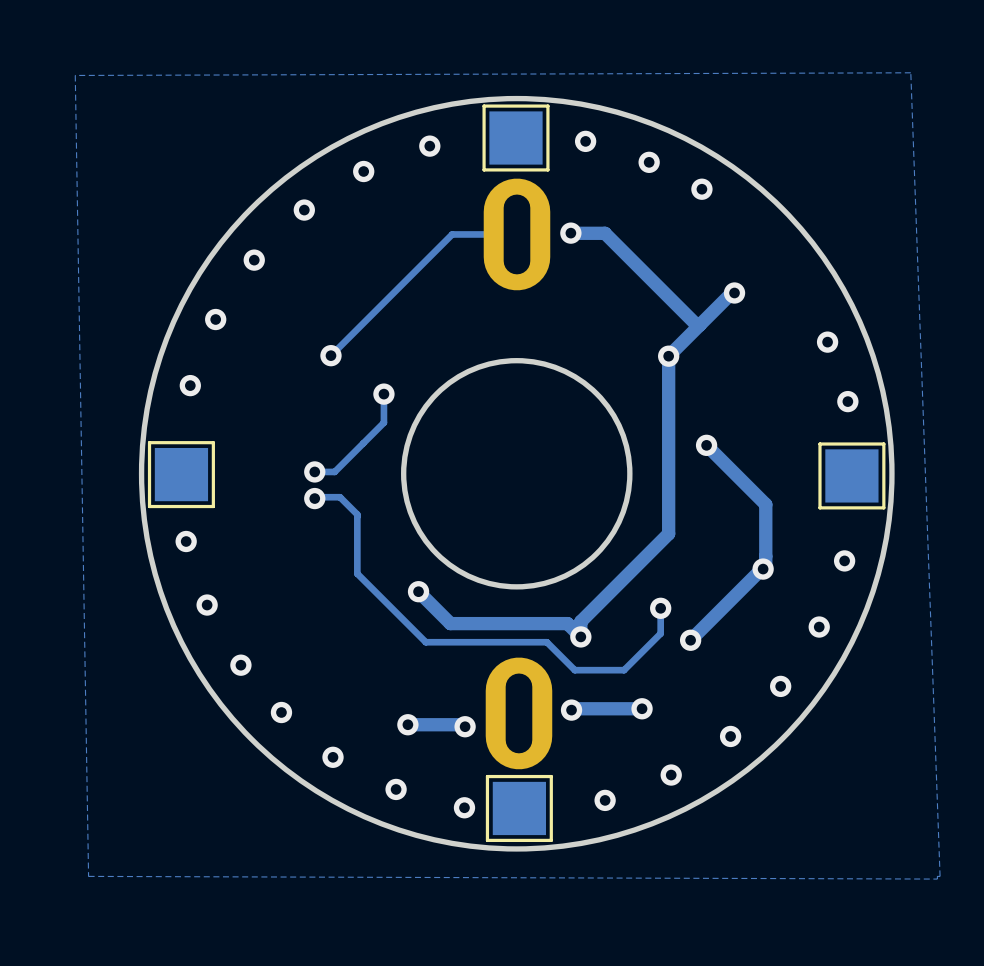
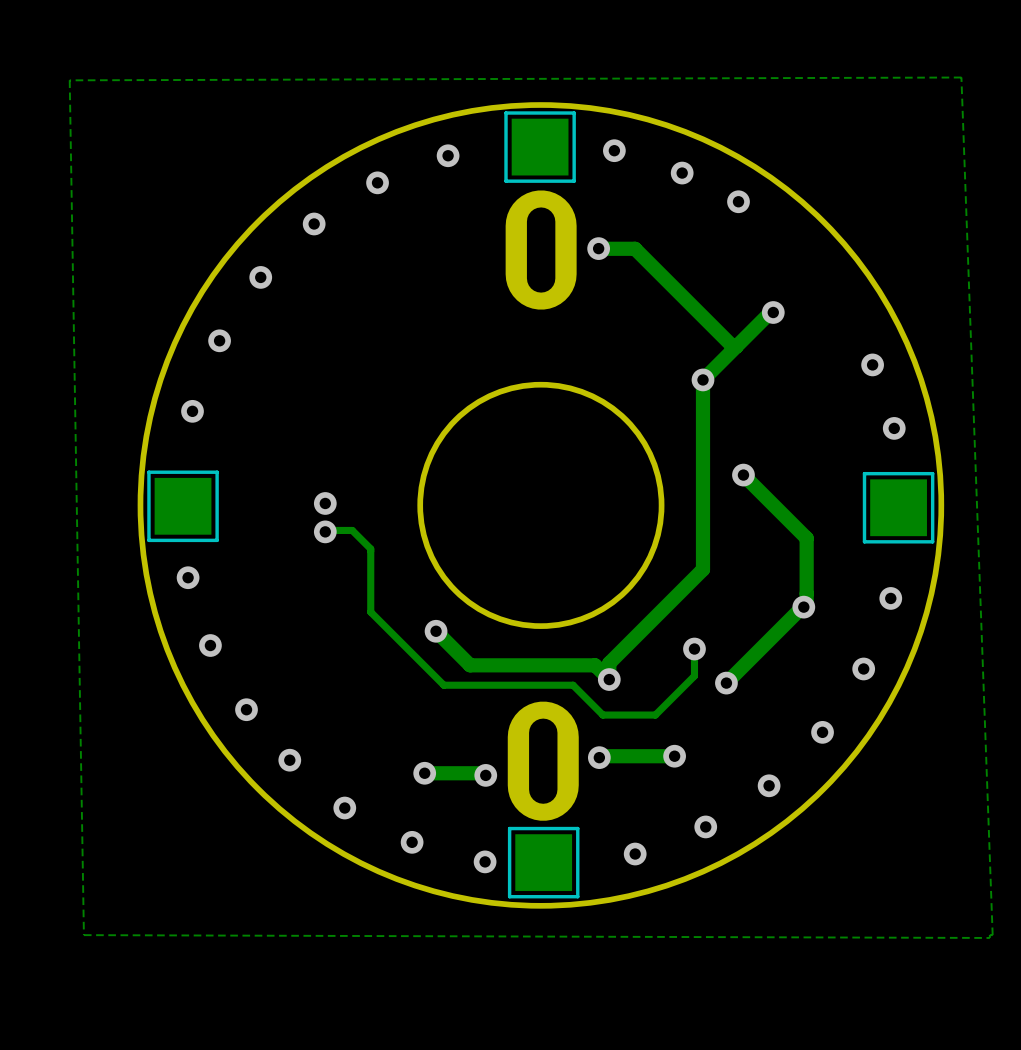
track: (516, 234) (452, 234) (330, 355) -> none
via: (330, 355) -> none
track: (383, 394) (383, 422) (334, 471) (314, 471) -> none
via: (383, 394) -> none

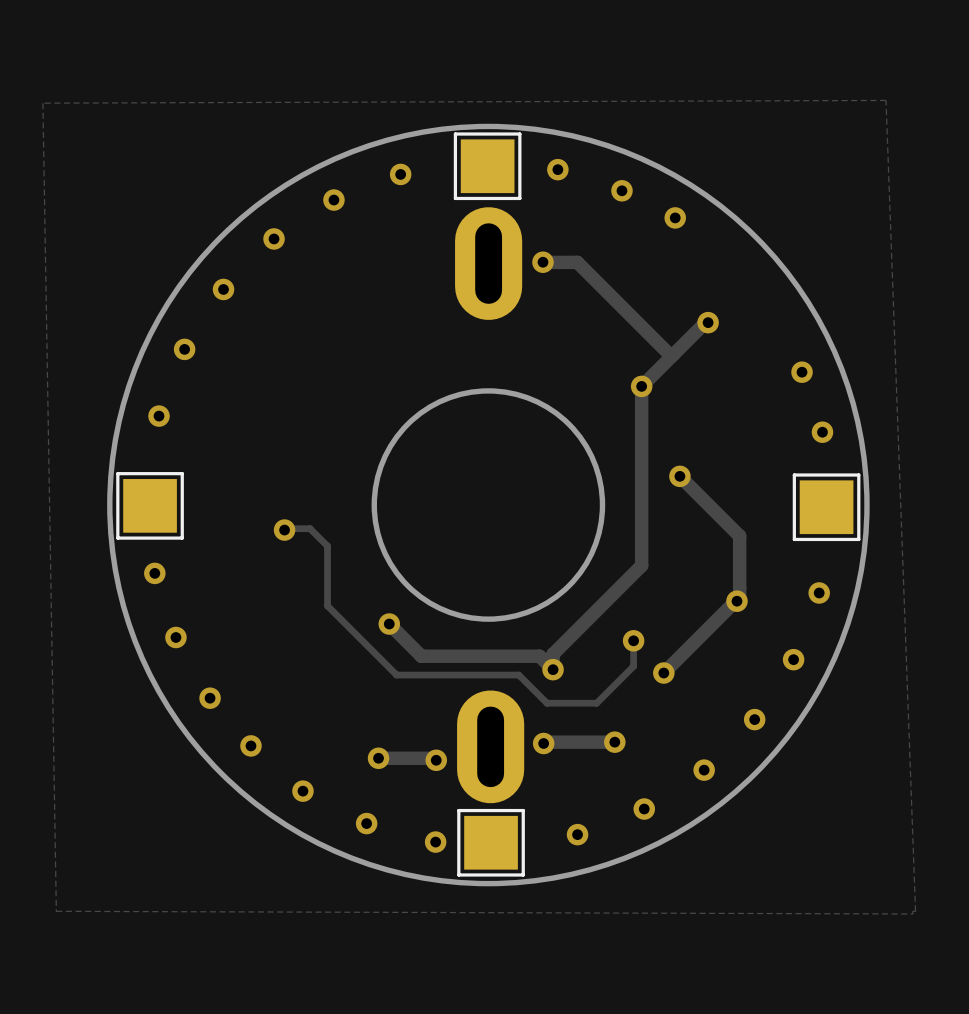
via: (325, 503) -> none

